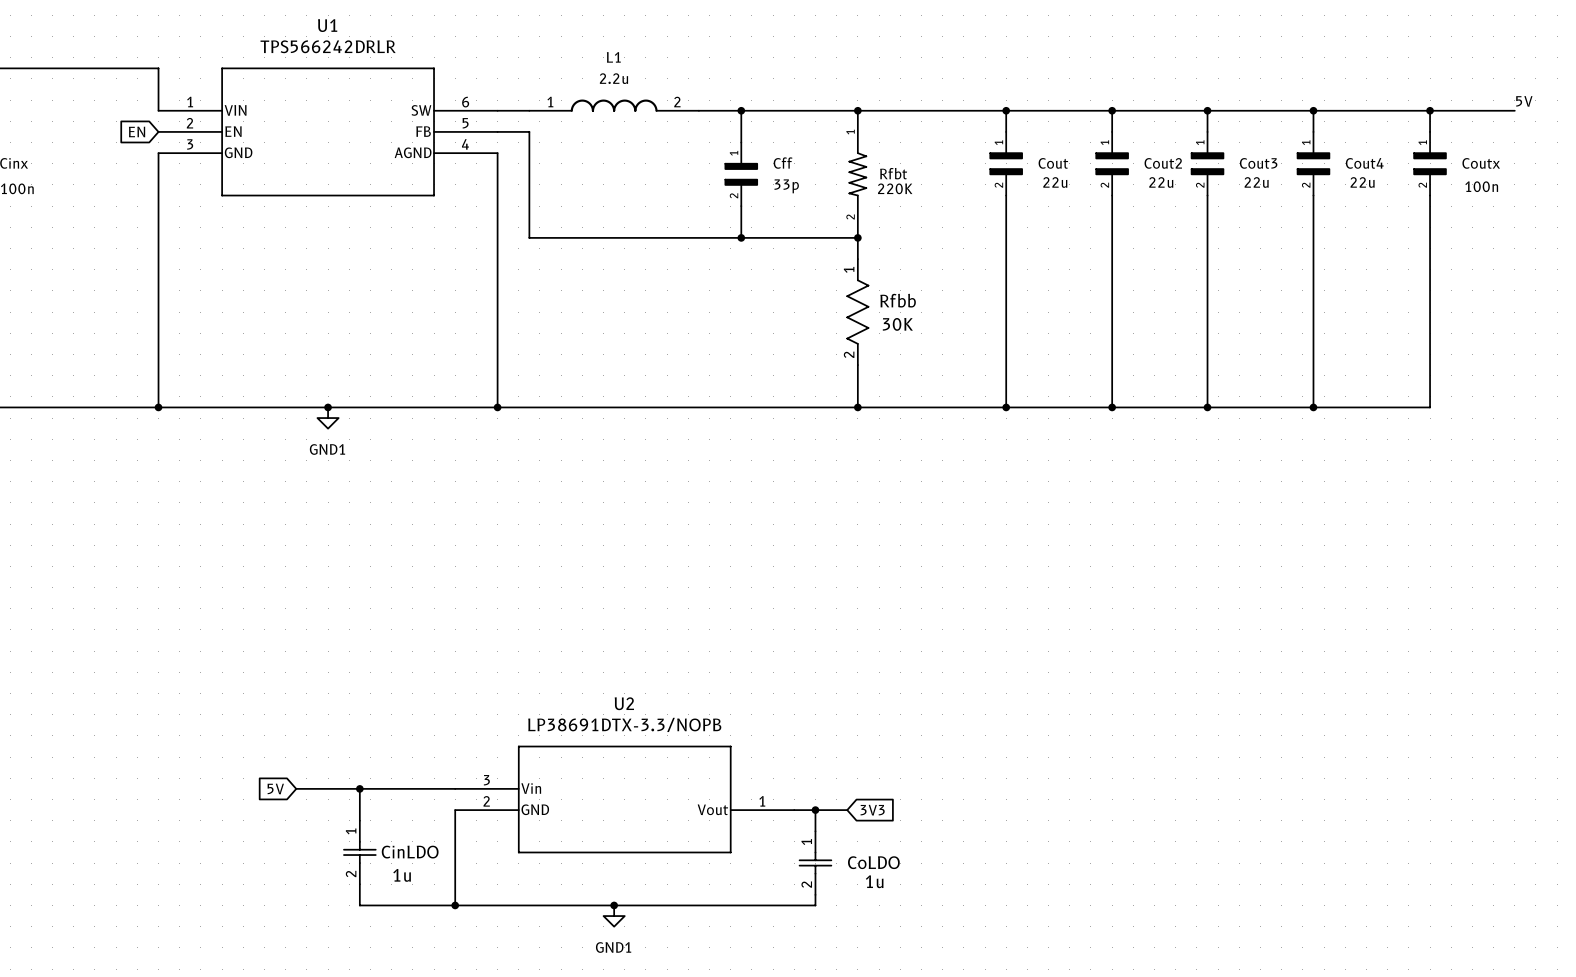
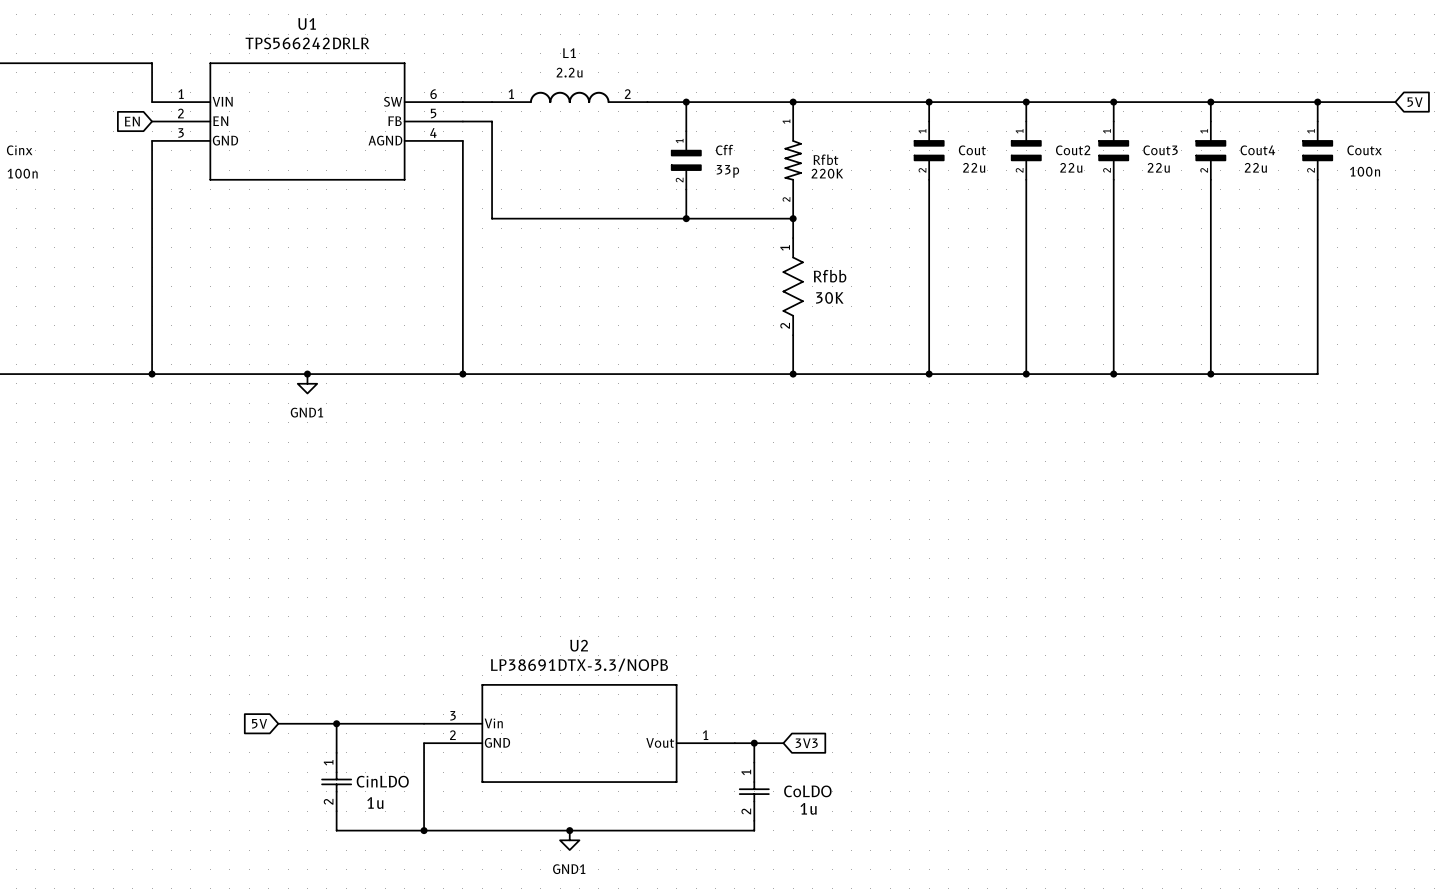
label: 5V (1524, 101) -> none
global label: none -> 5V (1415, 102)

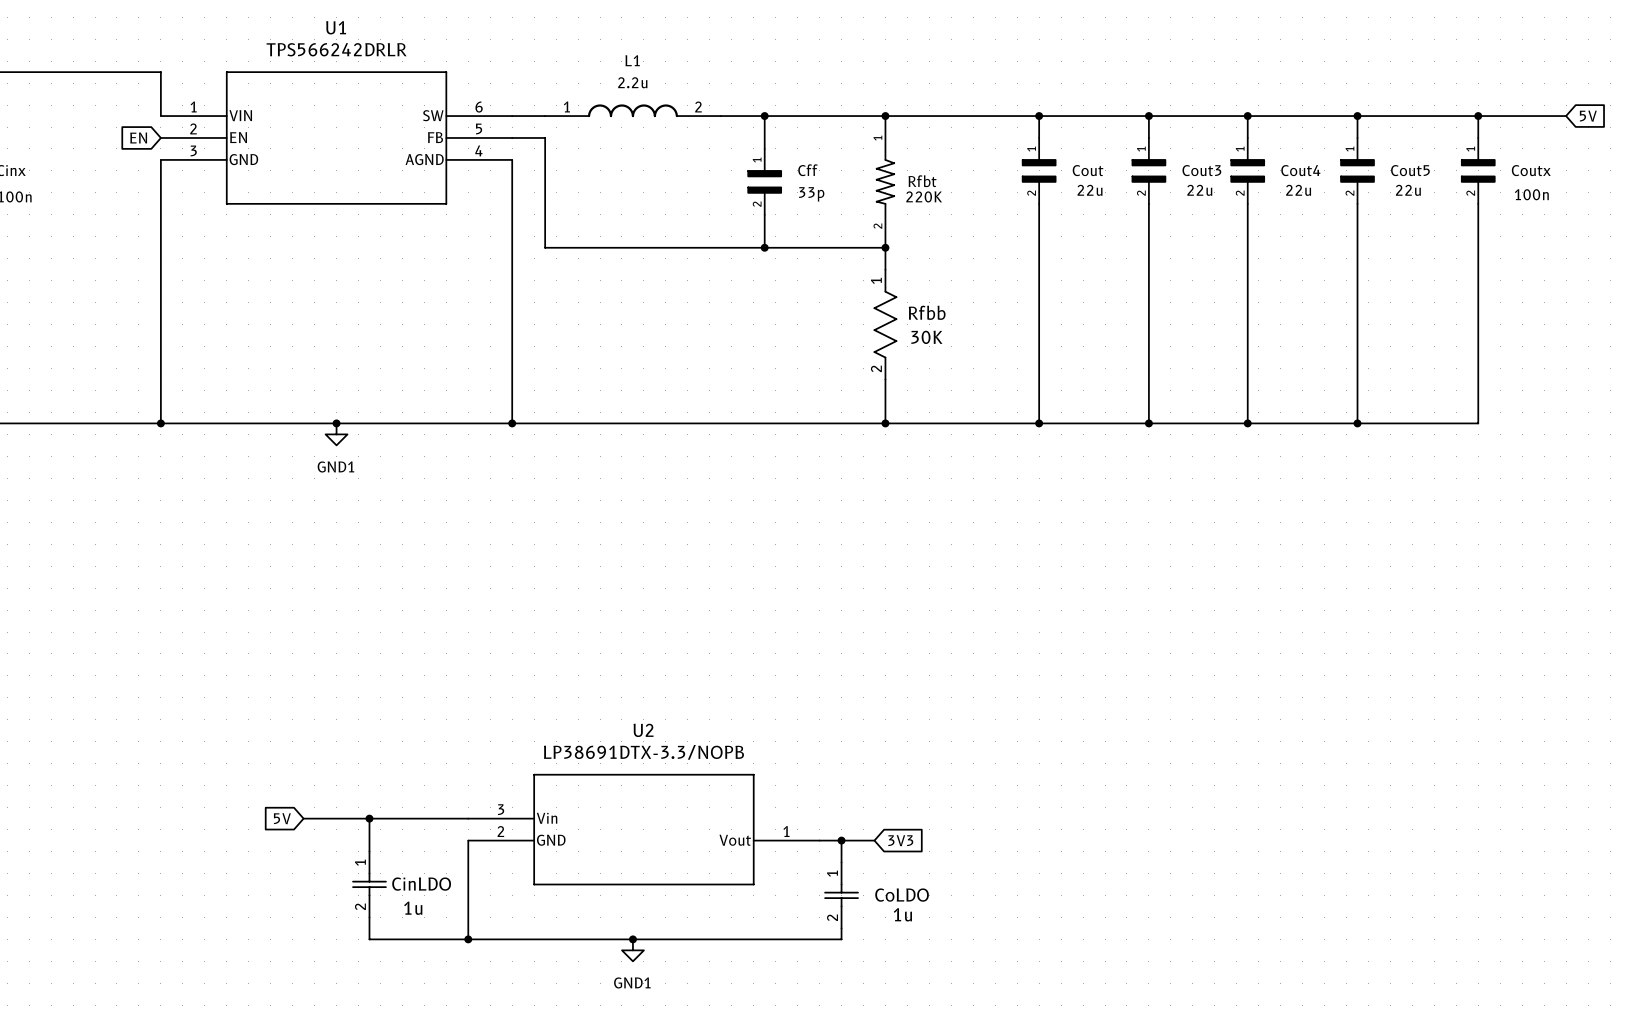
Cout2 name: Cout2 (1073, 150) -> Cout3 (1201, 170)
Cout3 name: Cout3 (1160, 150) -> Cout4 (1300, 170)
Cout4 name: Cout4 (1257, 150) -> Cout5 (1410, 170)

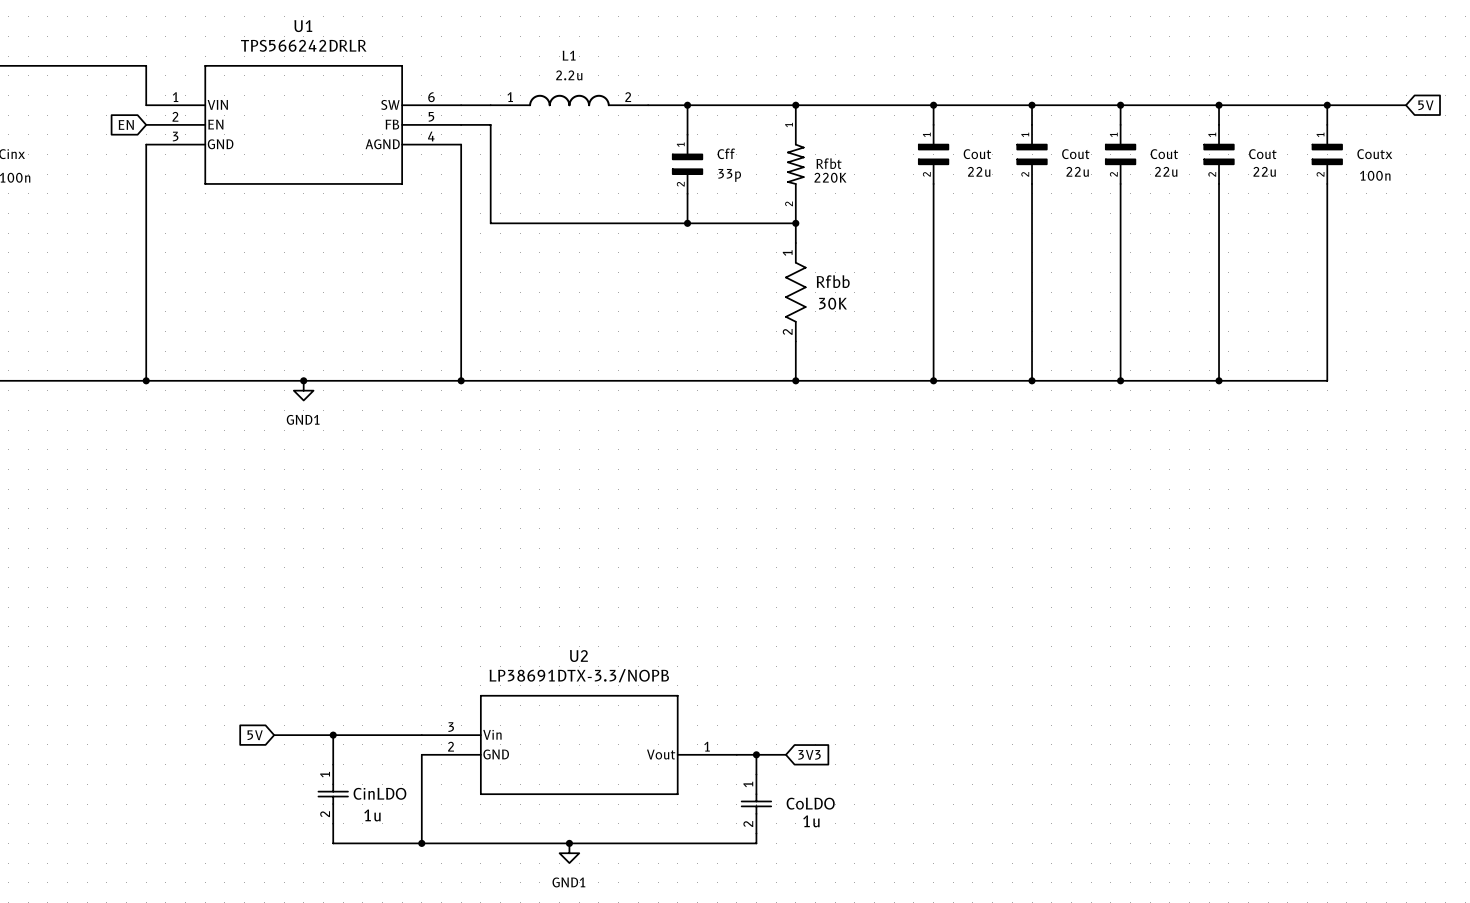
Cout3 name: Cout3 (1201, 170) -> Cout (1075, 154)
Cout4 name: Cout4 (1300, 170) -> Cout (1164, 154)
Cout5 name: Cout5 (1410, 170) -> Cout (1262, 154)

